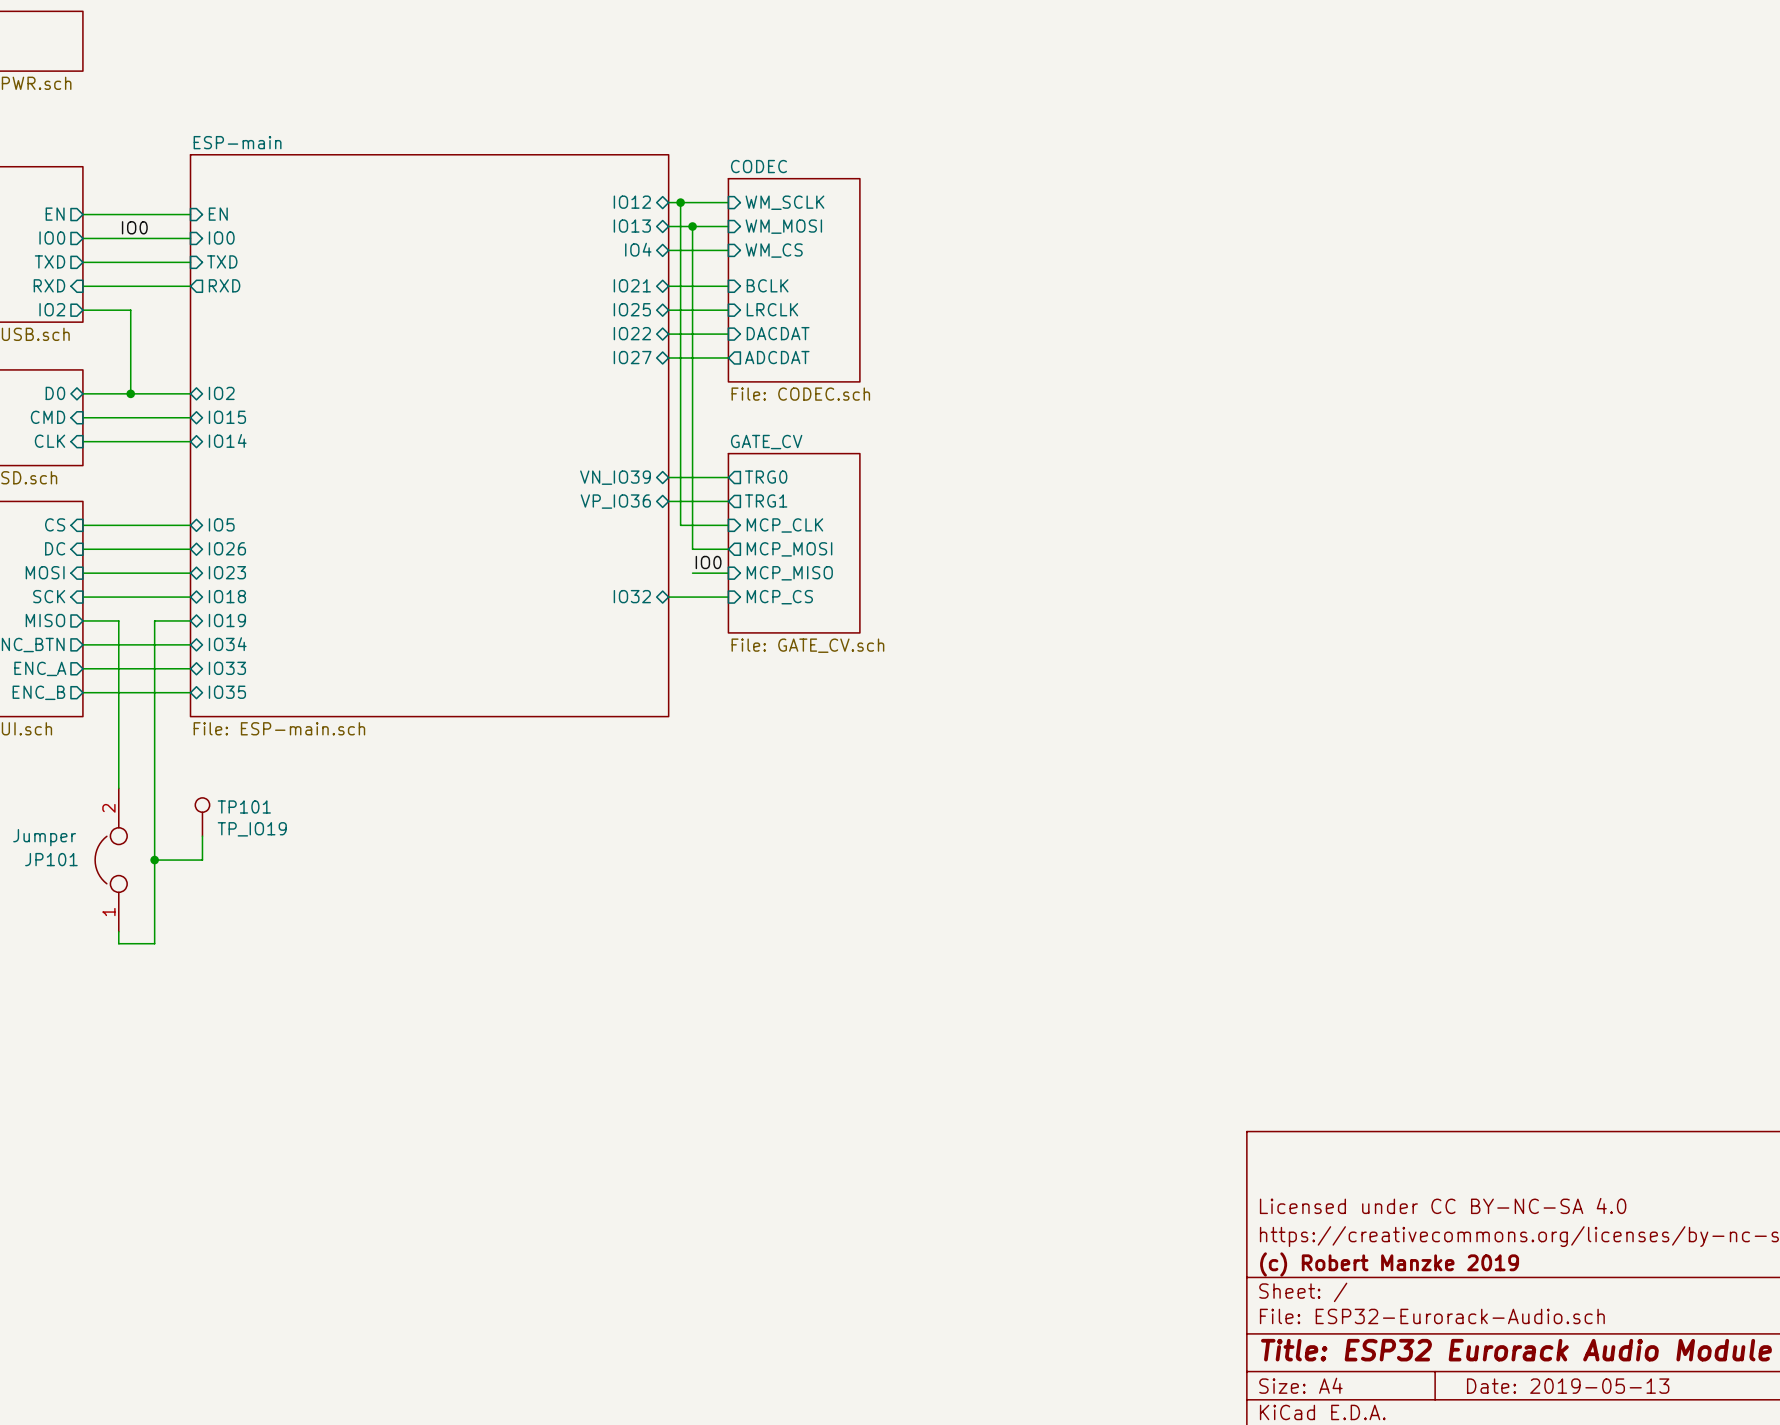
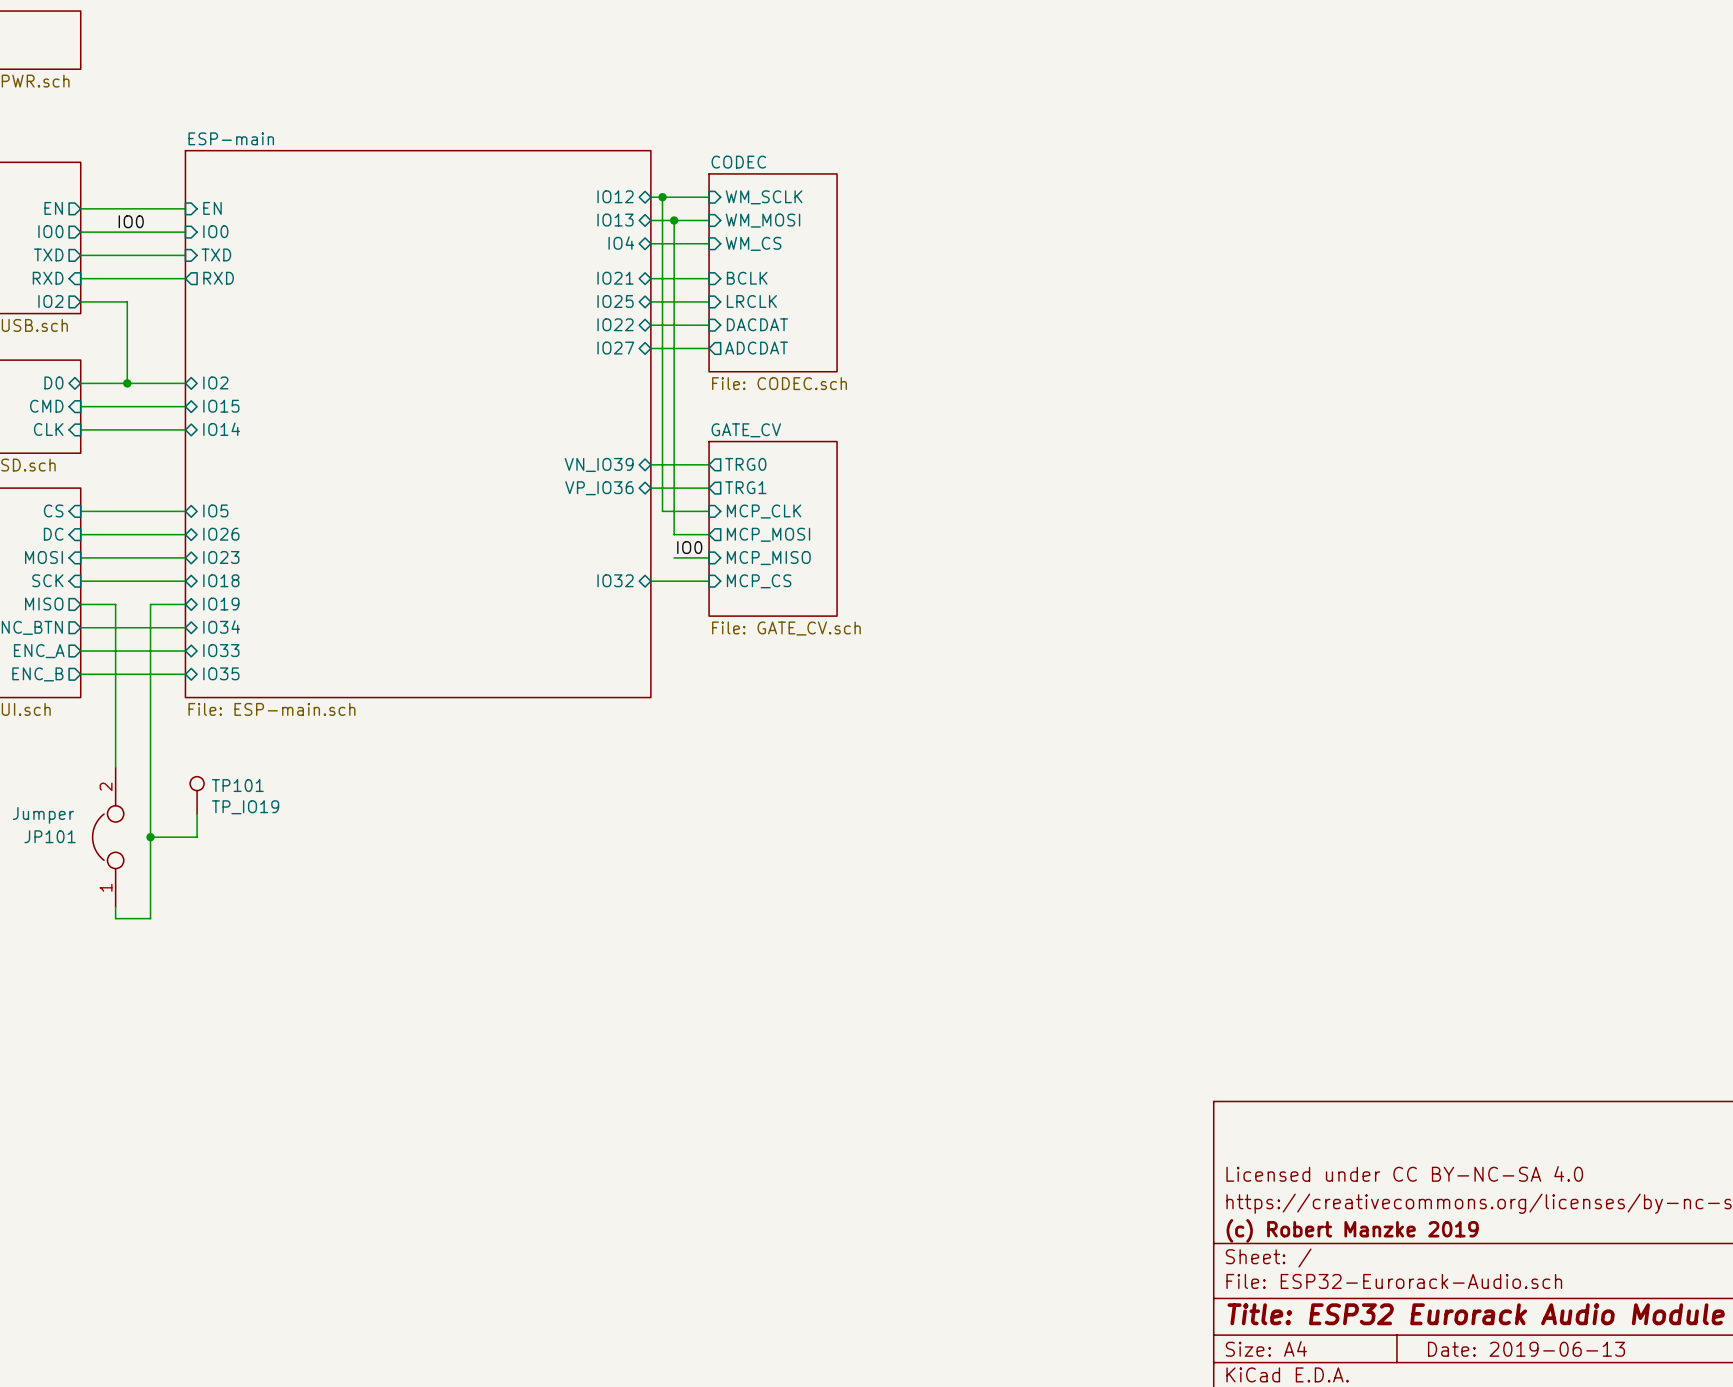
title block: Date: 2019-05-13 (1568, 1386) -> Date: 2019-06-13 (1526, 1349)

